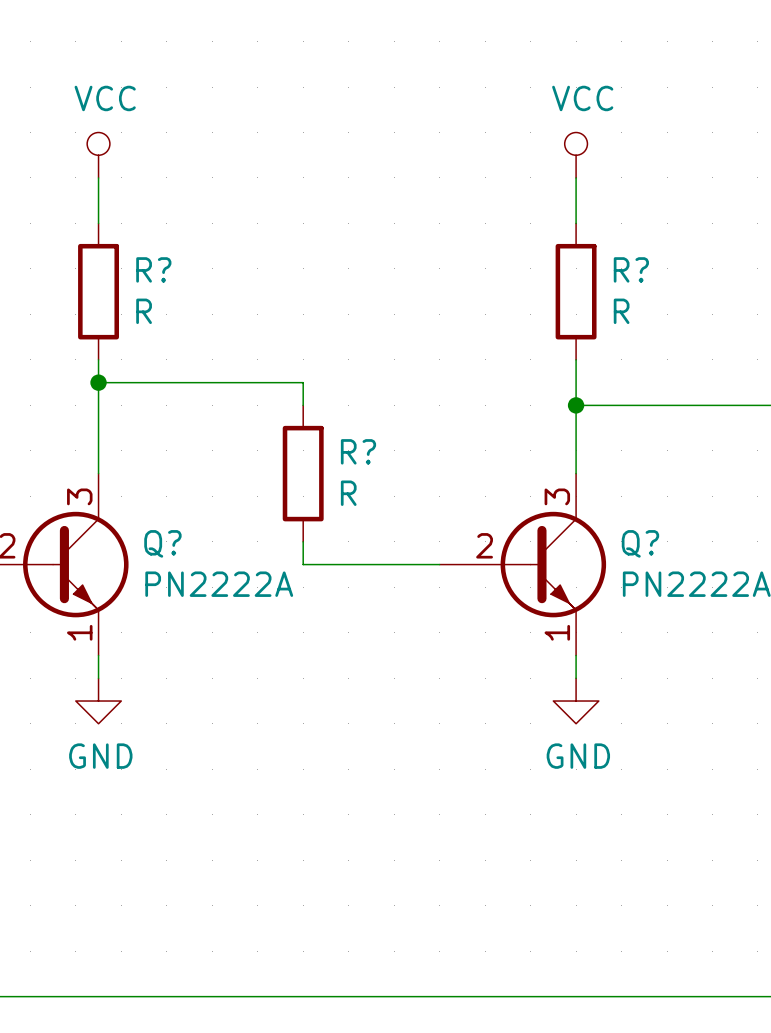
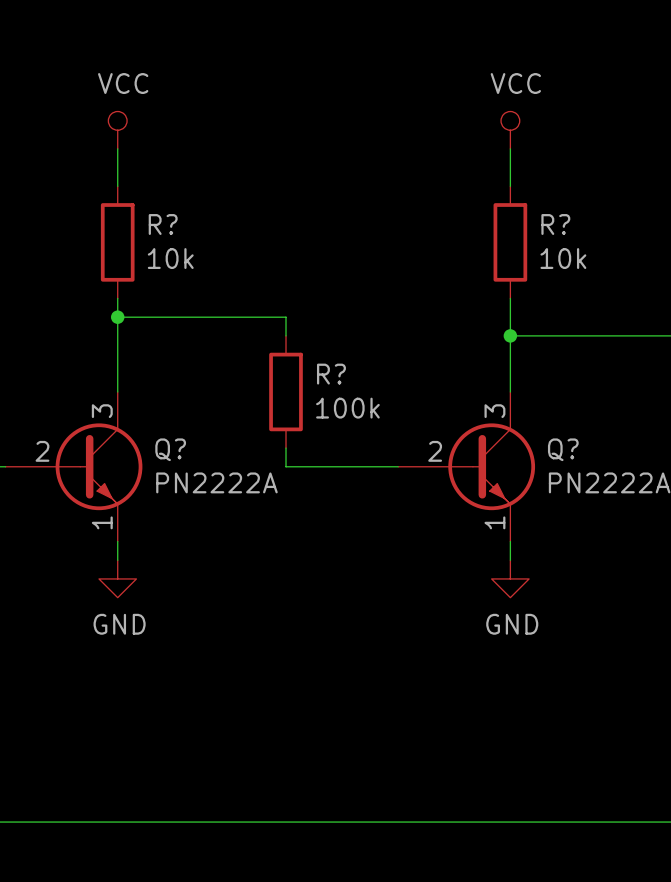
R? value: R (144, 311) -> 10k (170, 258)
R? value: R (621, 311) -> 10k (563, 258)
R? value: R (348, 493) -> 100k (347, 408)

